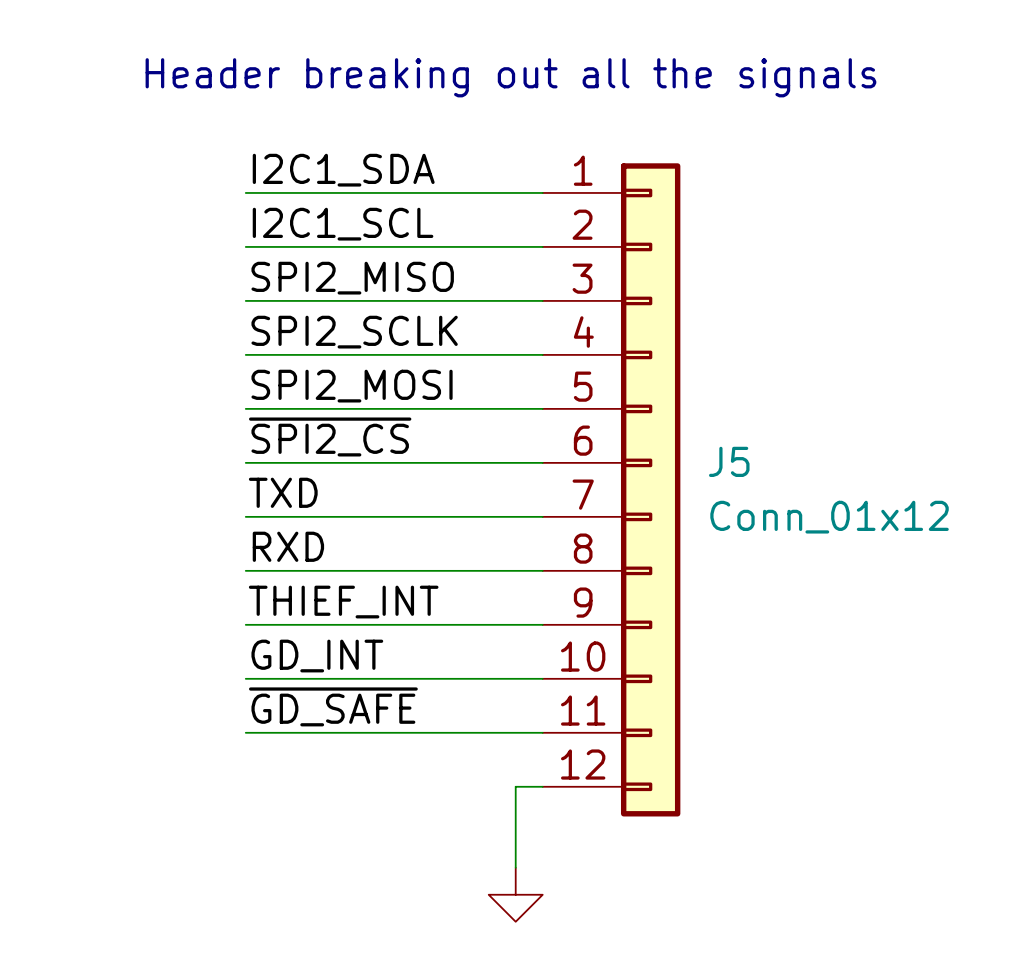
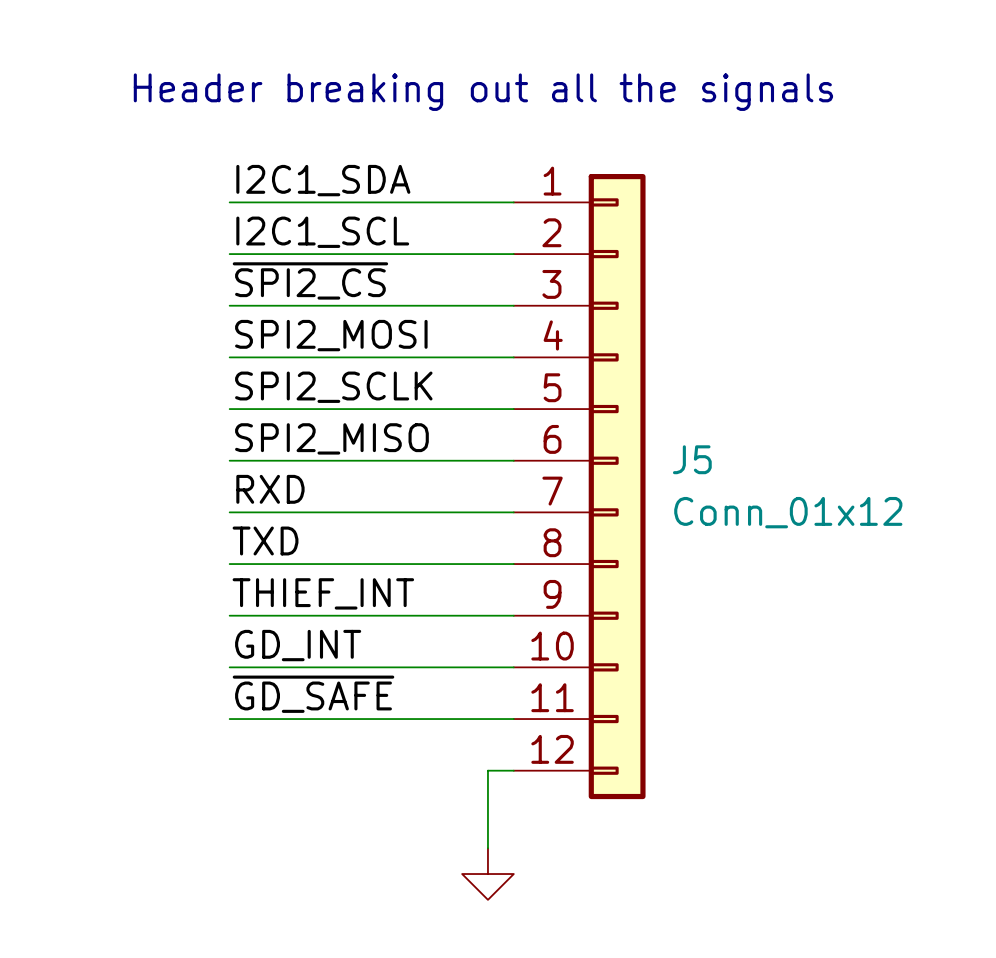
label: SPI2_MISO (352, 278) -> ~{SPI2_CS} (310, 280)
label: SPI2_SCLK (354, 332) -> SPI2_MOSI (331, 335)
label: SPI2_MOSI (352, 386) -> SPI2_SCLK (333, 387)
label: ~{SPI2_CS} (330, 436) -> SPI2_MISO (331, 438)
label: TXD (283, 492) -> RXD (270, 489)
label: RXD (288, 546) -> TXD (265, 540)

